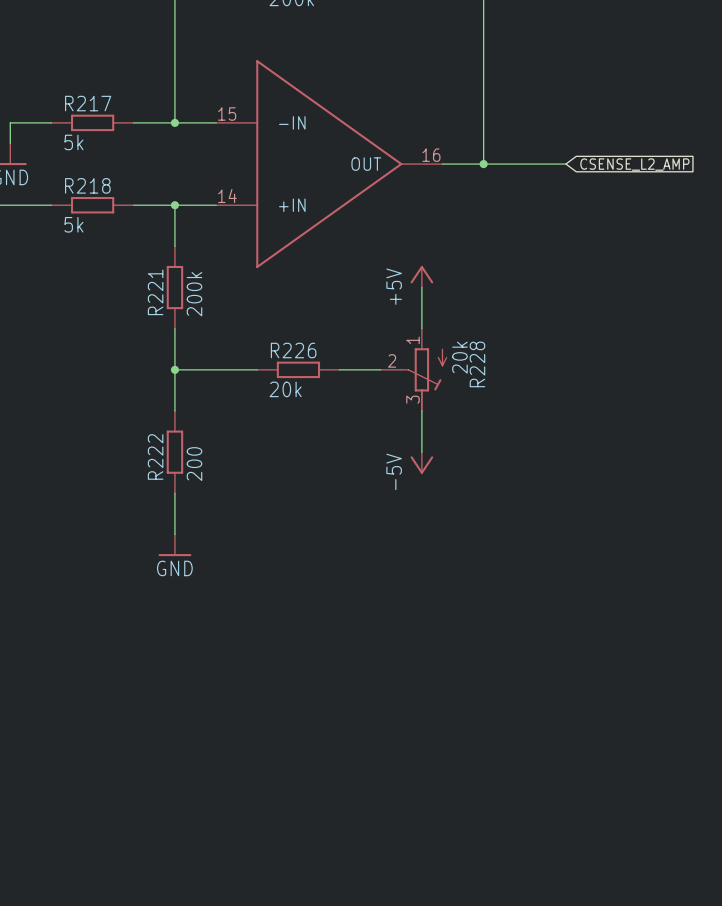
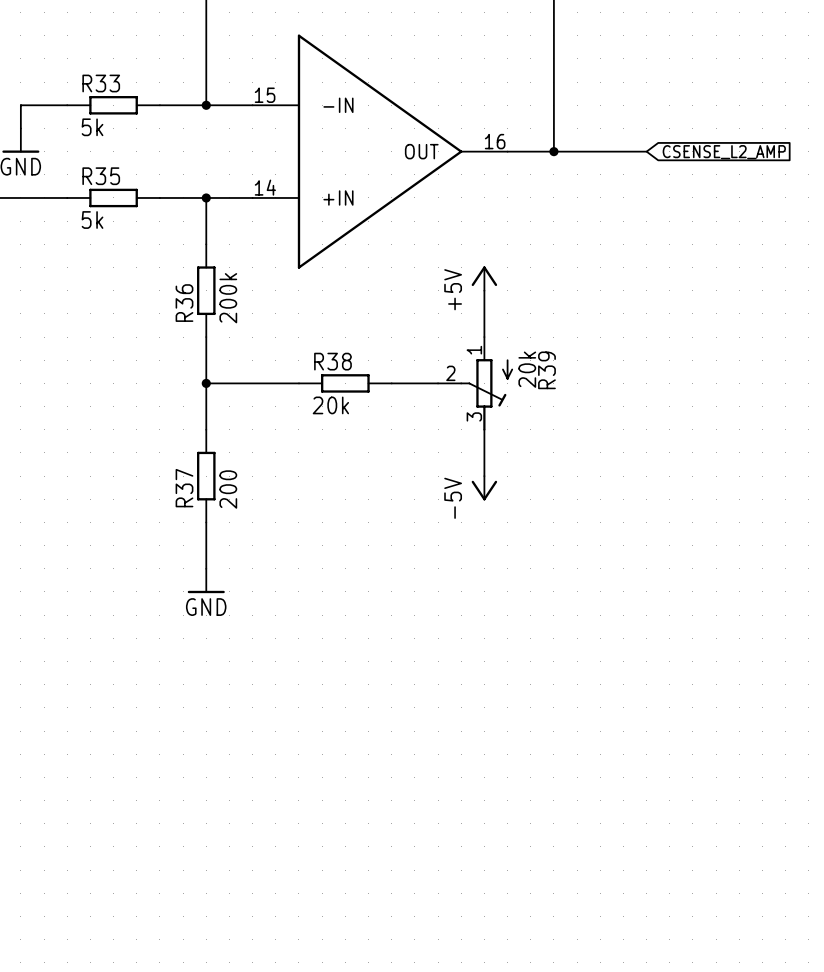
R217 name: R217 (88, 103) -> R33 (101, 83)
R218 name: R218 (87, 185) -> R35 (101, 176)
R221 name: R221 (155, 292) -> R36 (184, 303)
R226 name: R226 (293, 350) -> R38 (332, 361)
R228 name: R228 (477, 364) -> R39 (546, 370)
R222 name: R222 (155, 456) -> R37 (184, 488)

